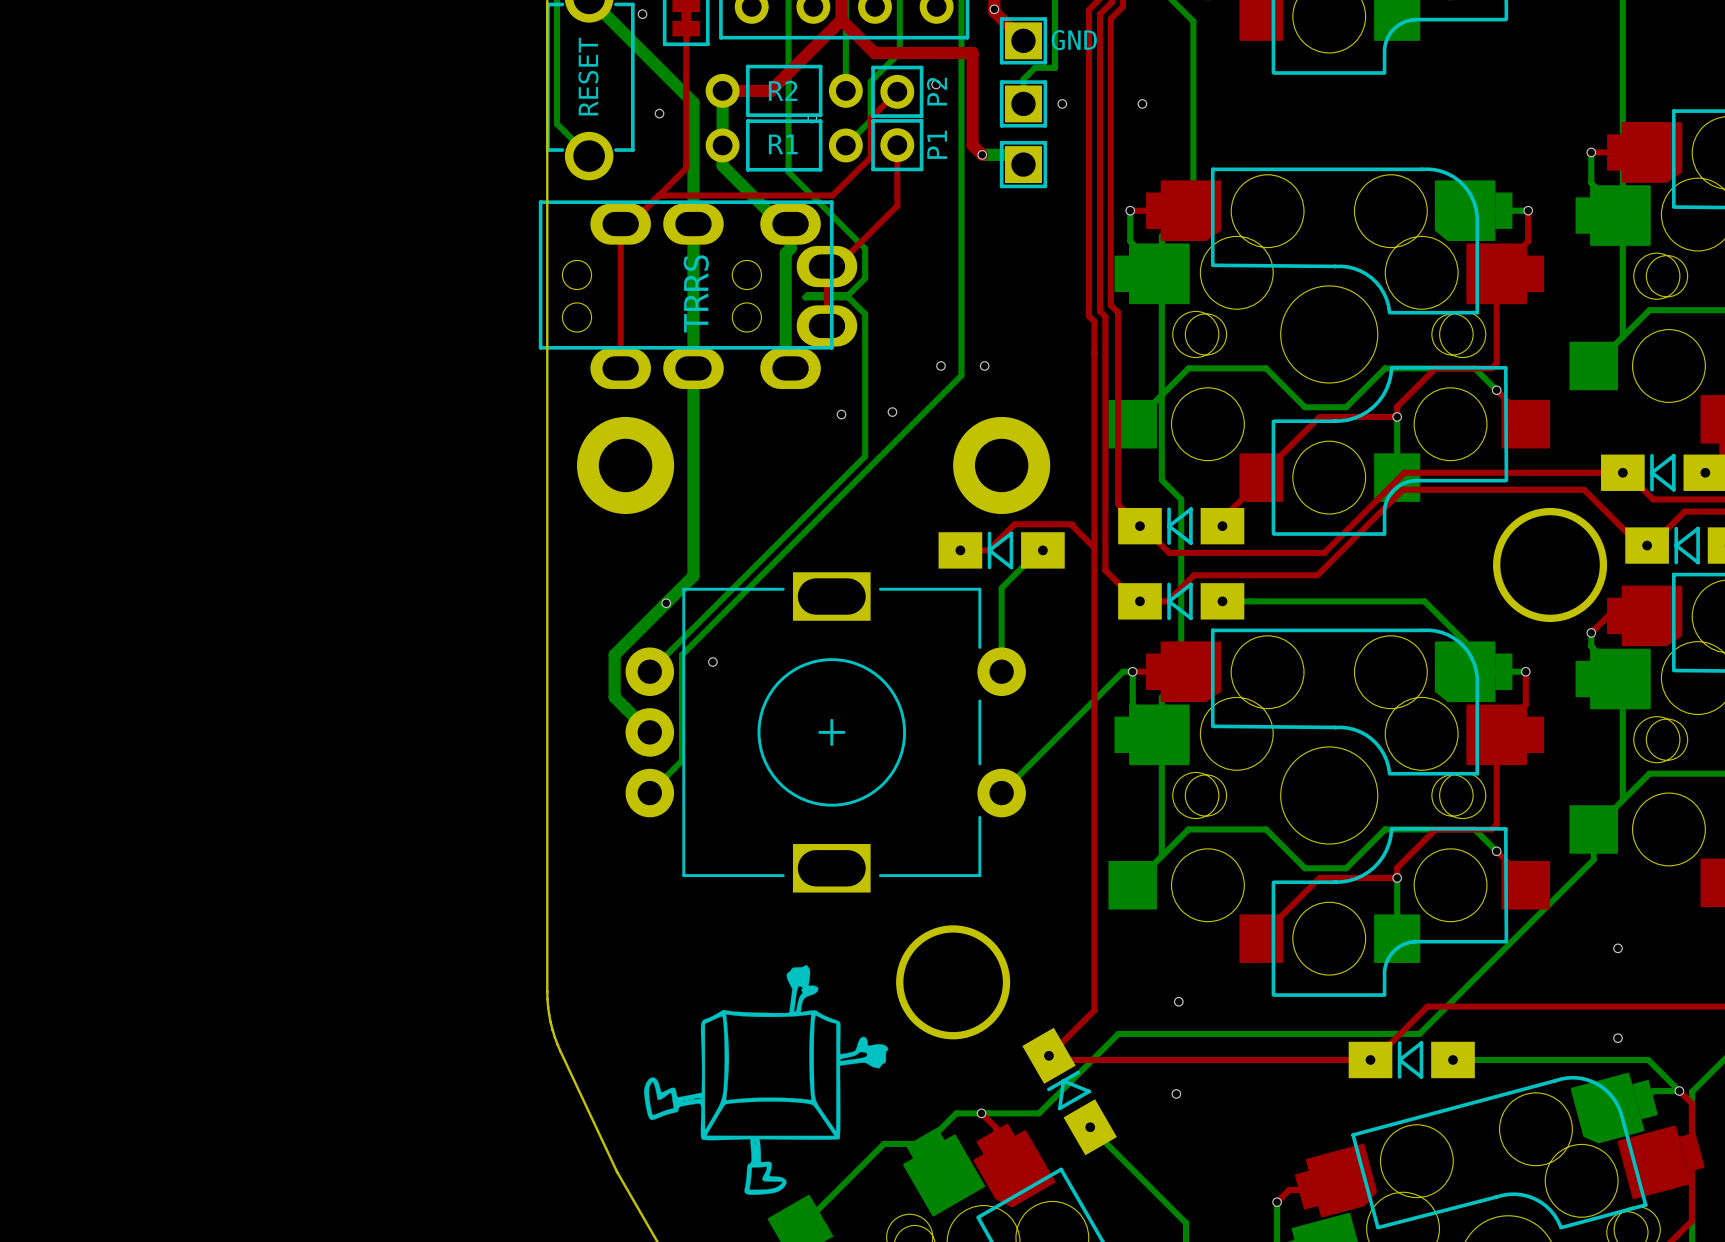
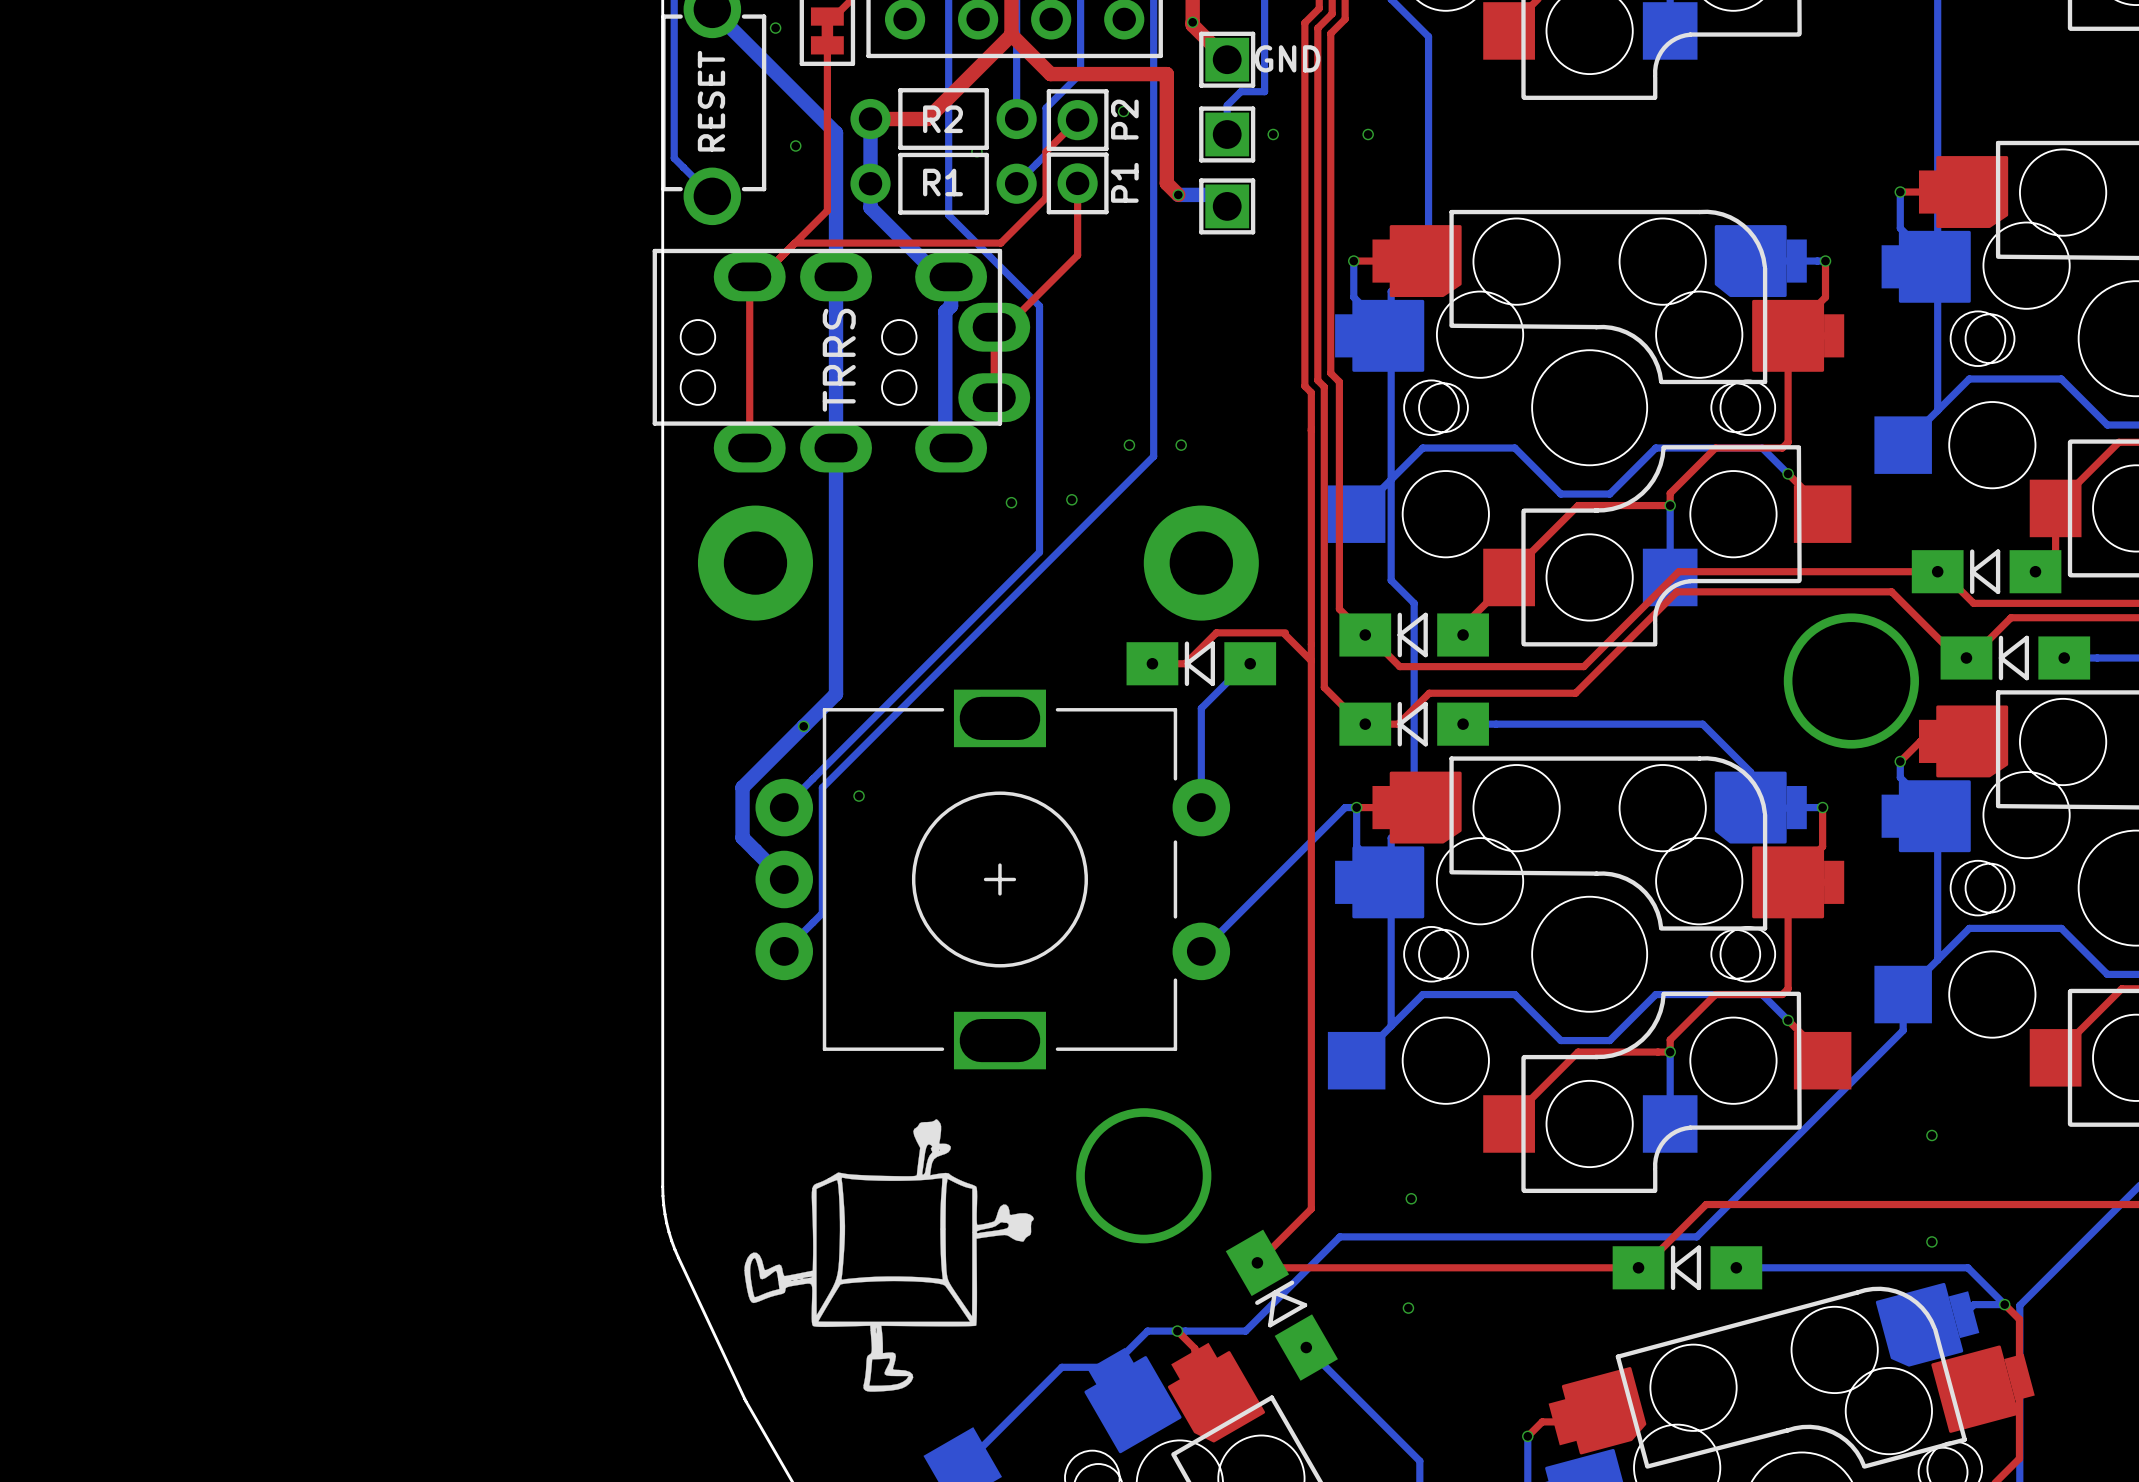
bottom track: (865, 278) (848, 295) (807, 295) (805, 297) (848, 297) (865, 314) -> (1039, 341) (1039, 383)
drawing position: (766, 1079) -> (889, 1255)

